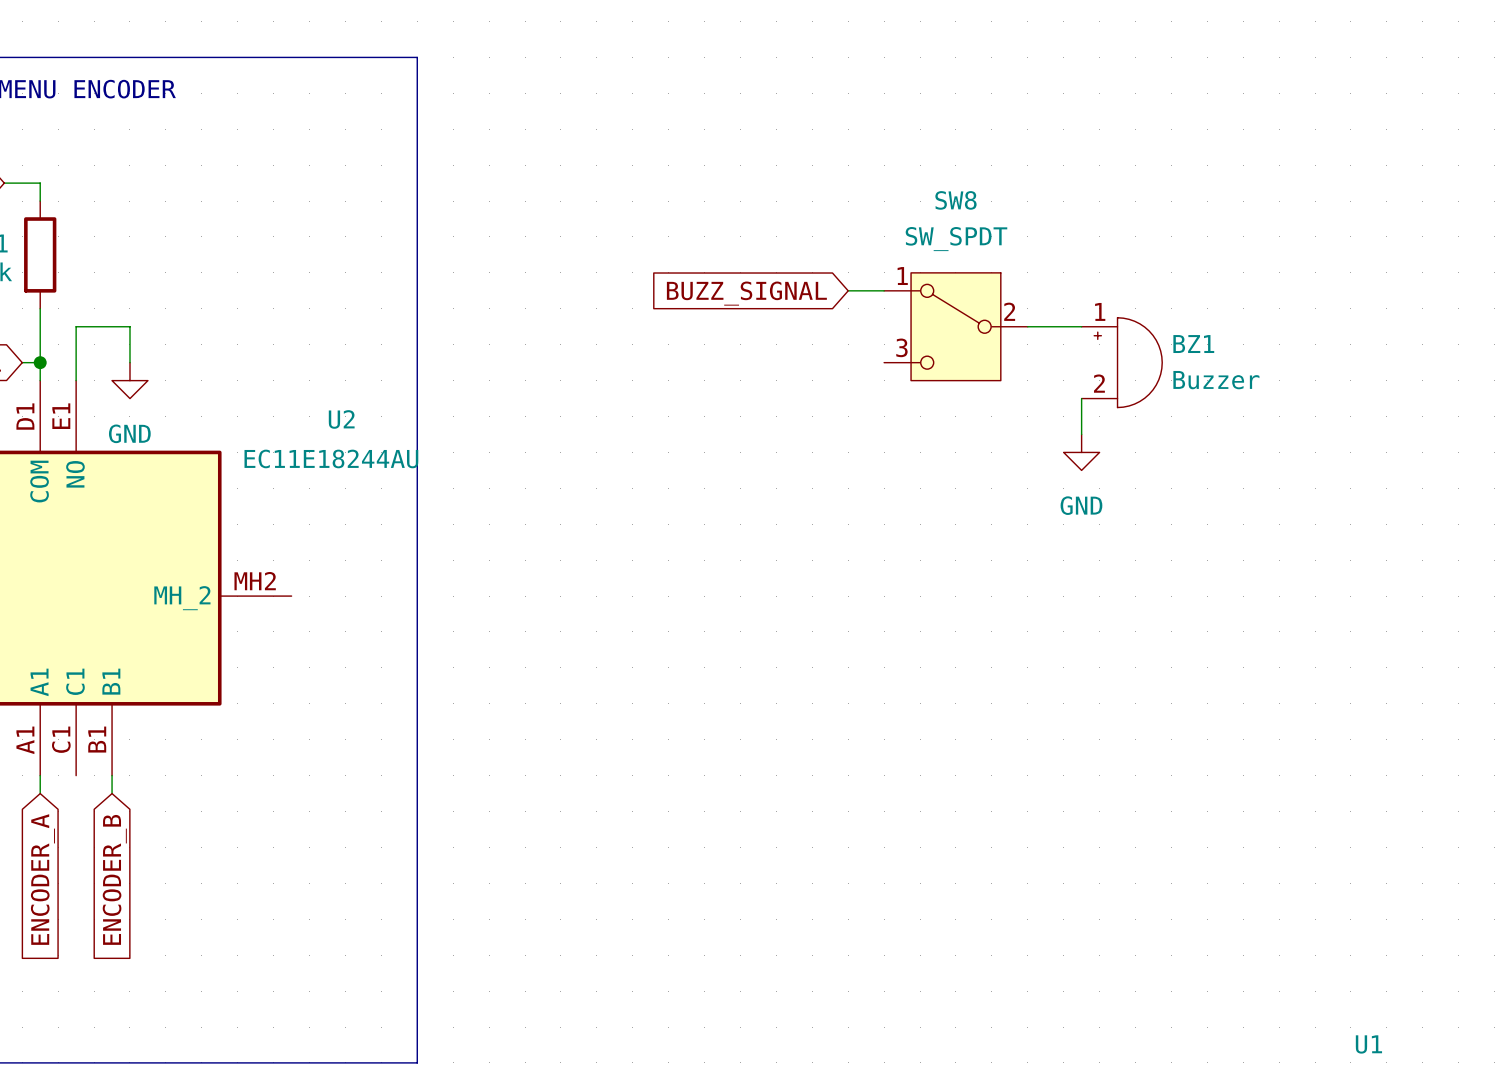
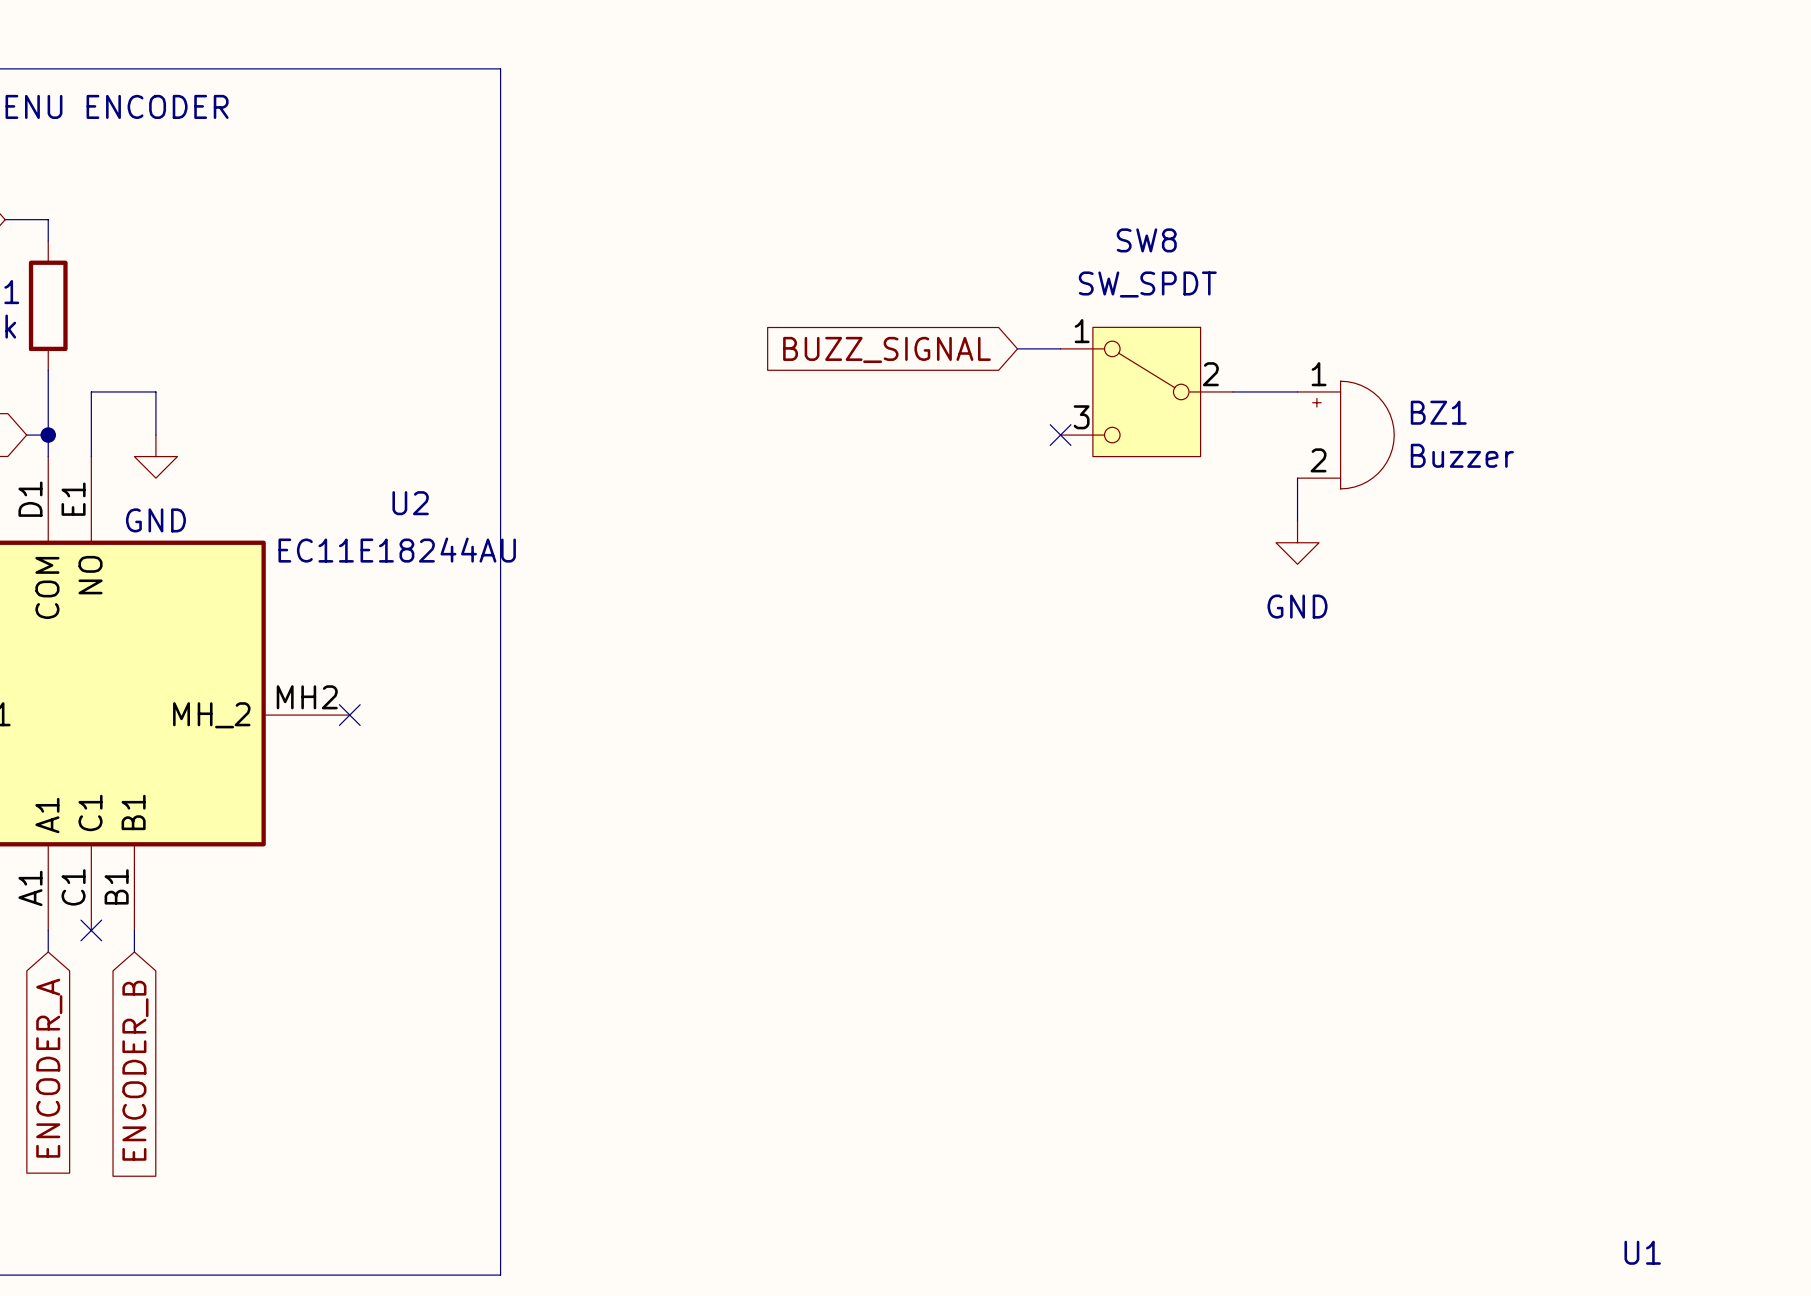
no-connect mark: none -> (1060, 435)
no-connect mark: none -> (349, 715)
no-connect mark: none -> (91, 930)

